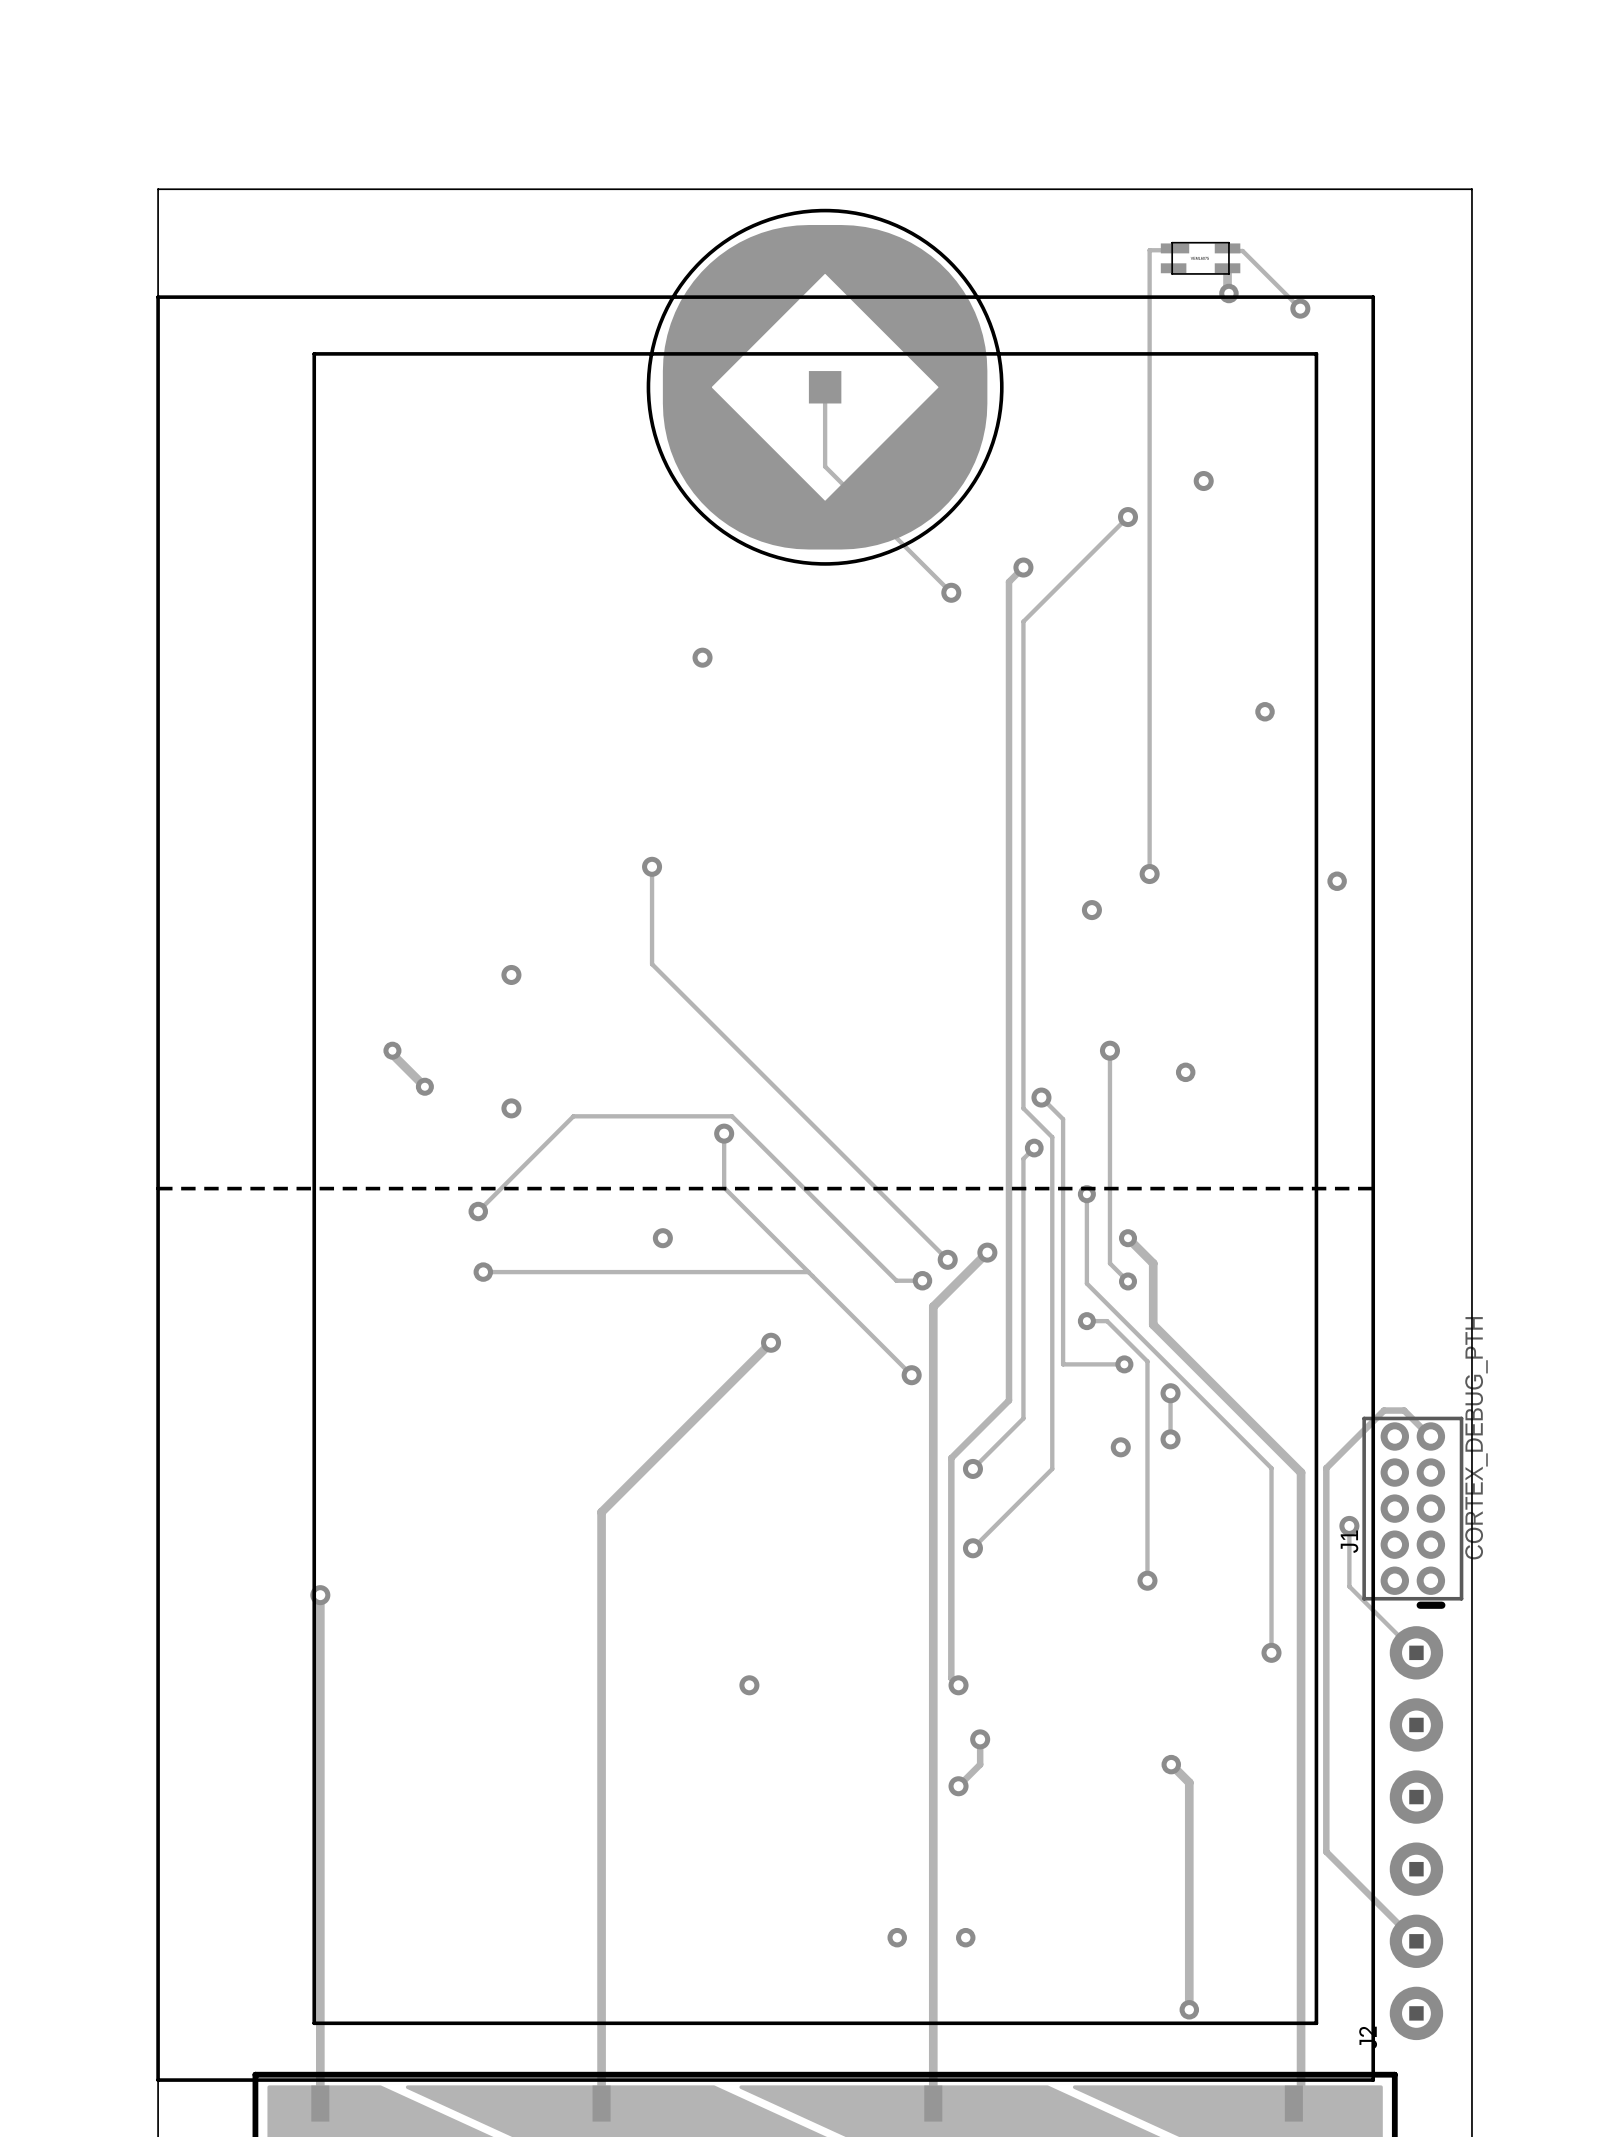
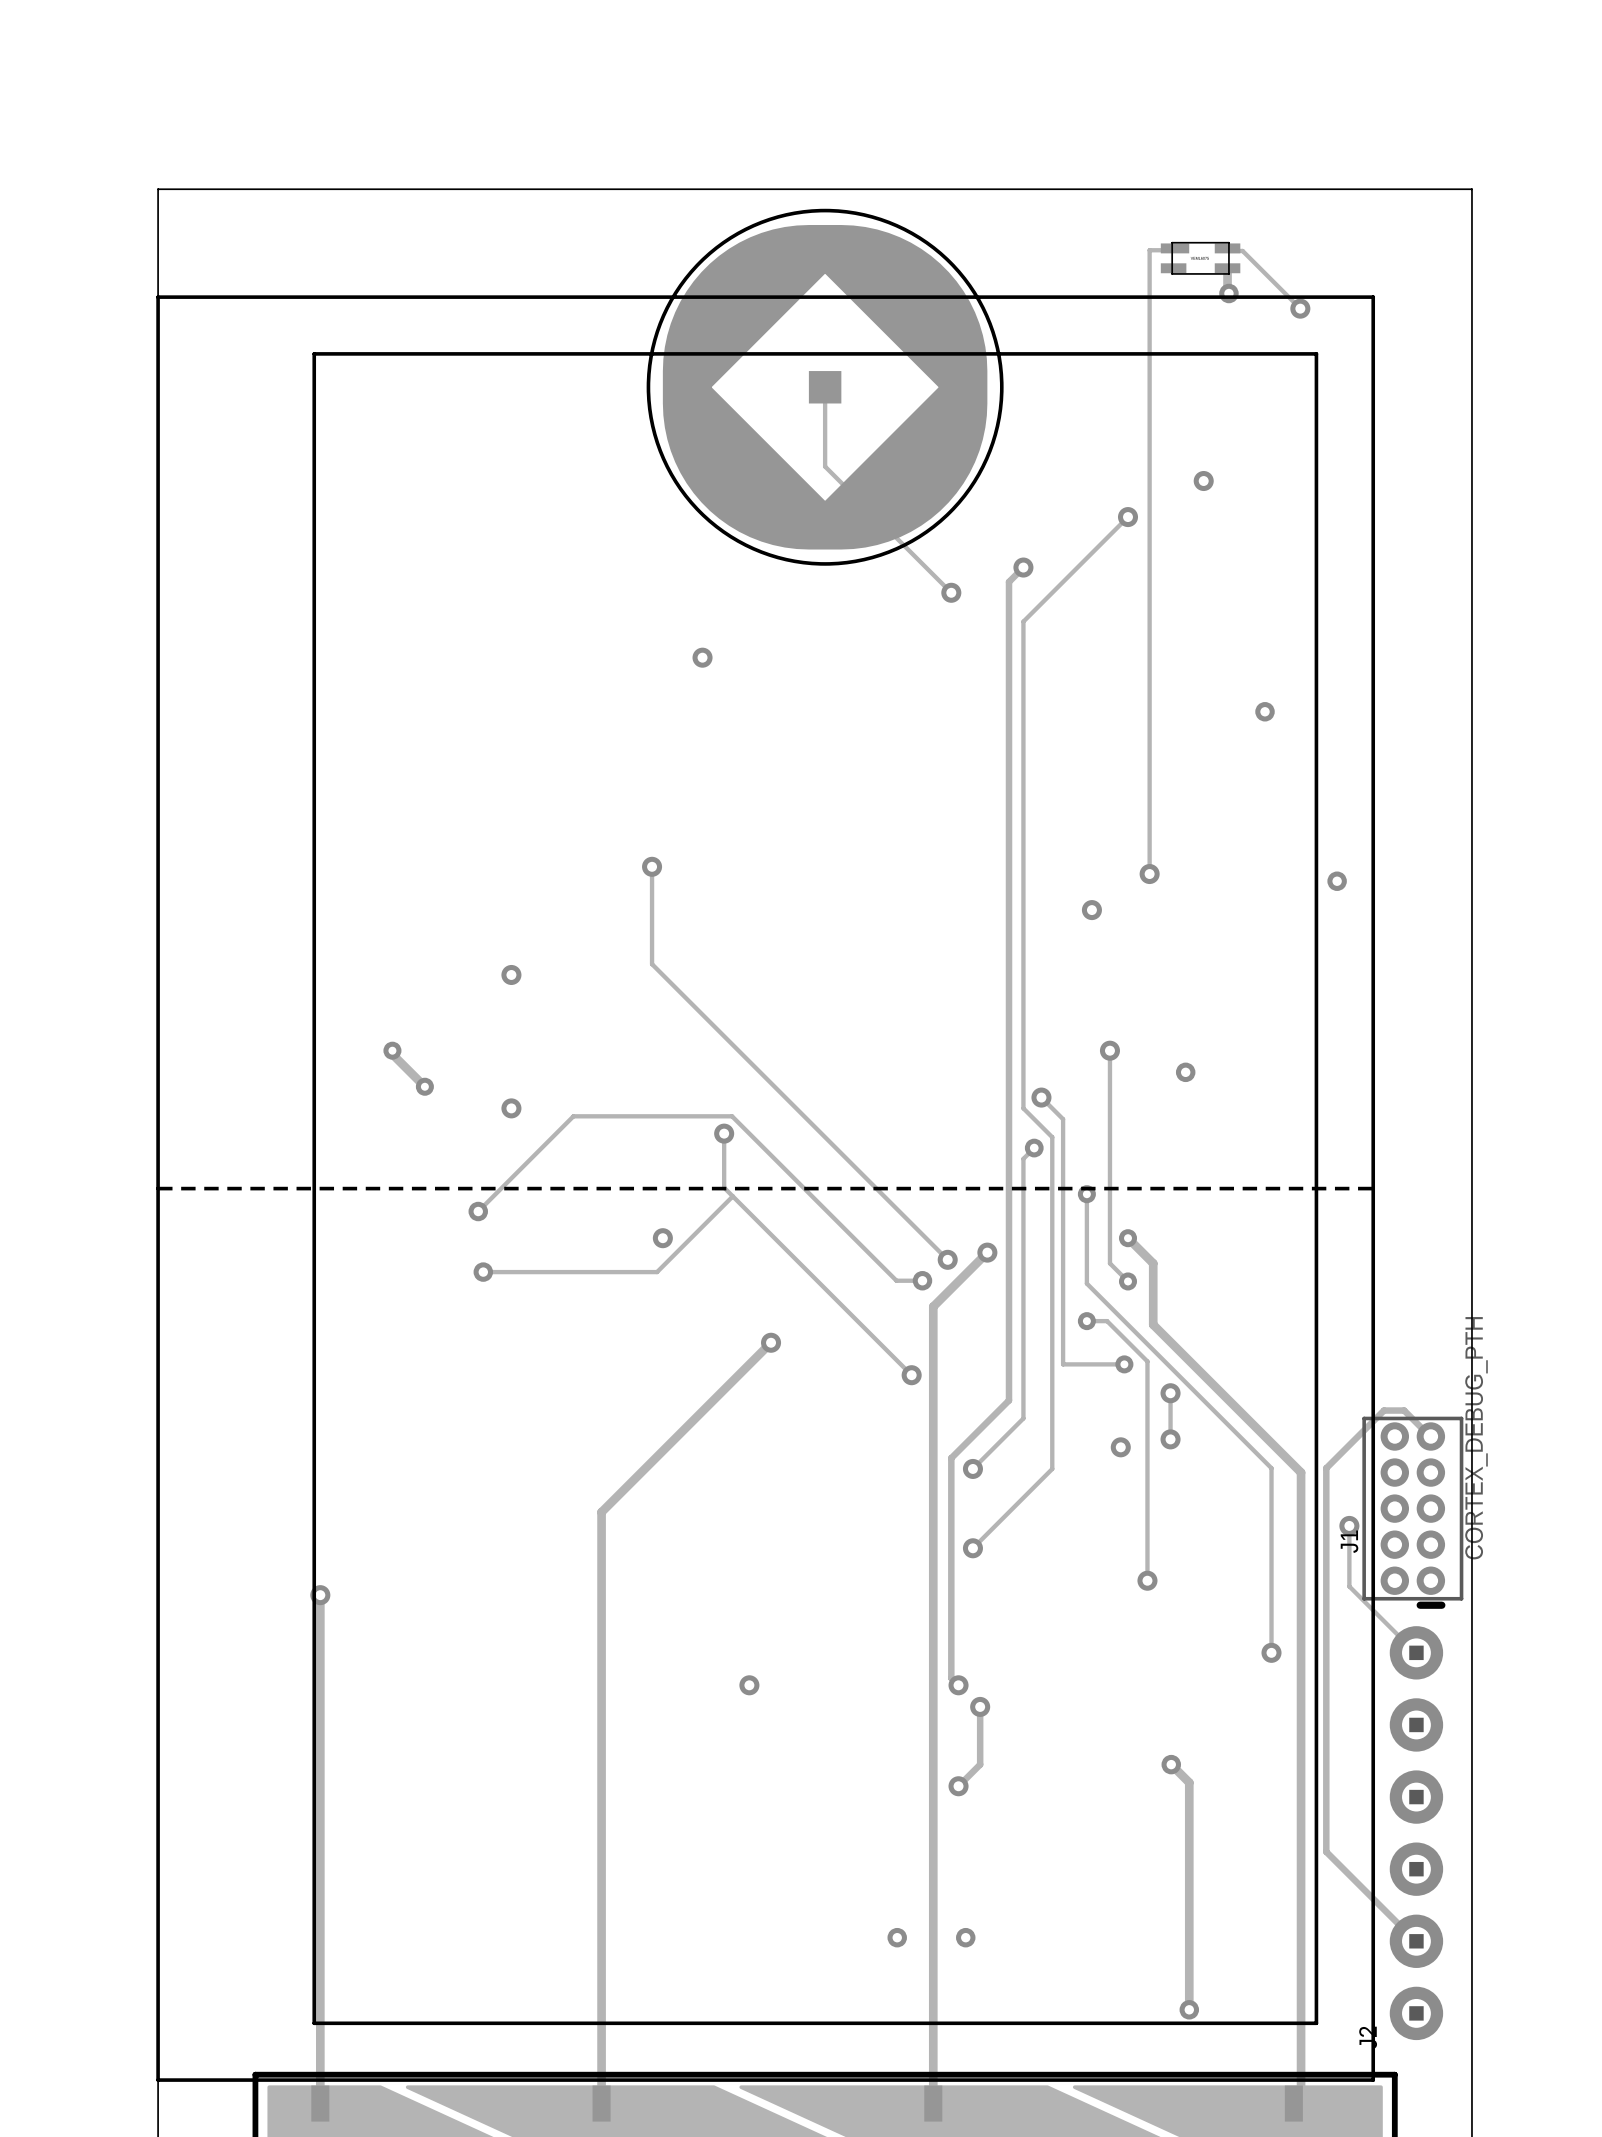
track: (657, 1272) (808, 1272) -> (657, 1272) (732, 1196)
track: none -> (980, 1706) (980, 1739)
via position: (980, 1739) -> (980, 1706)

